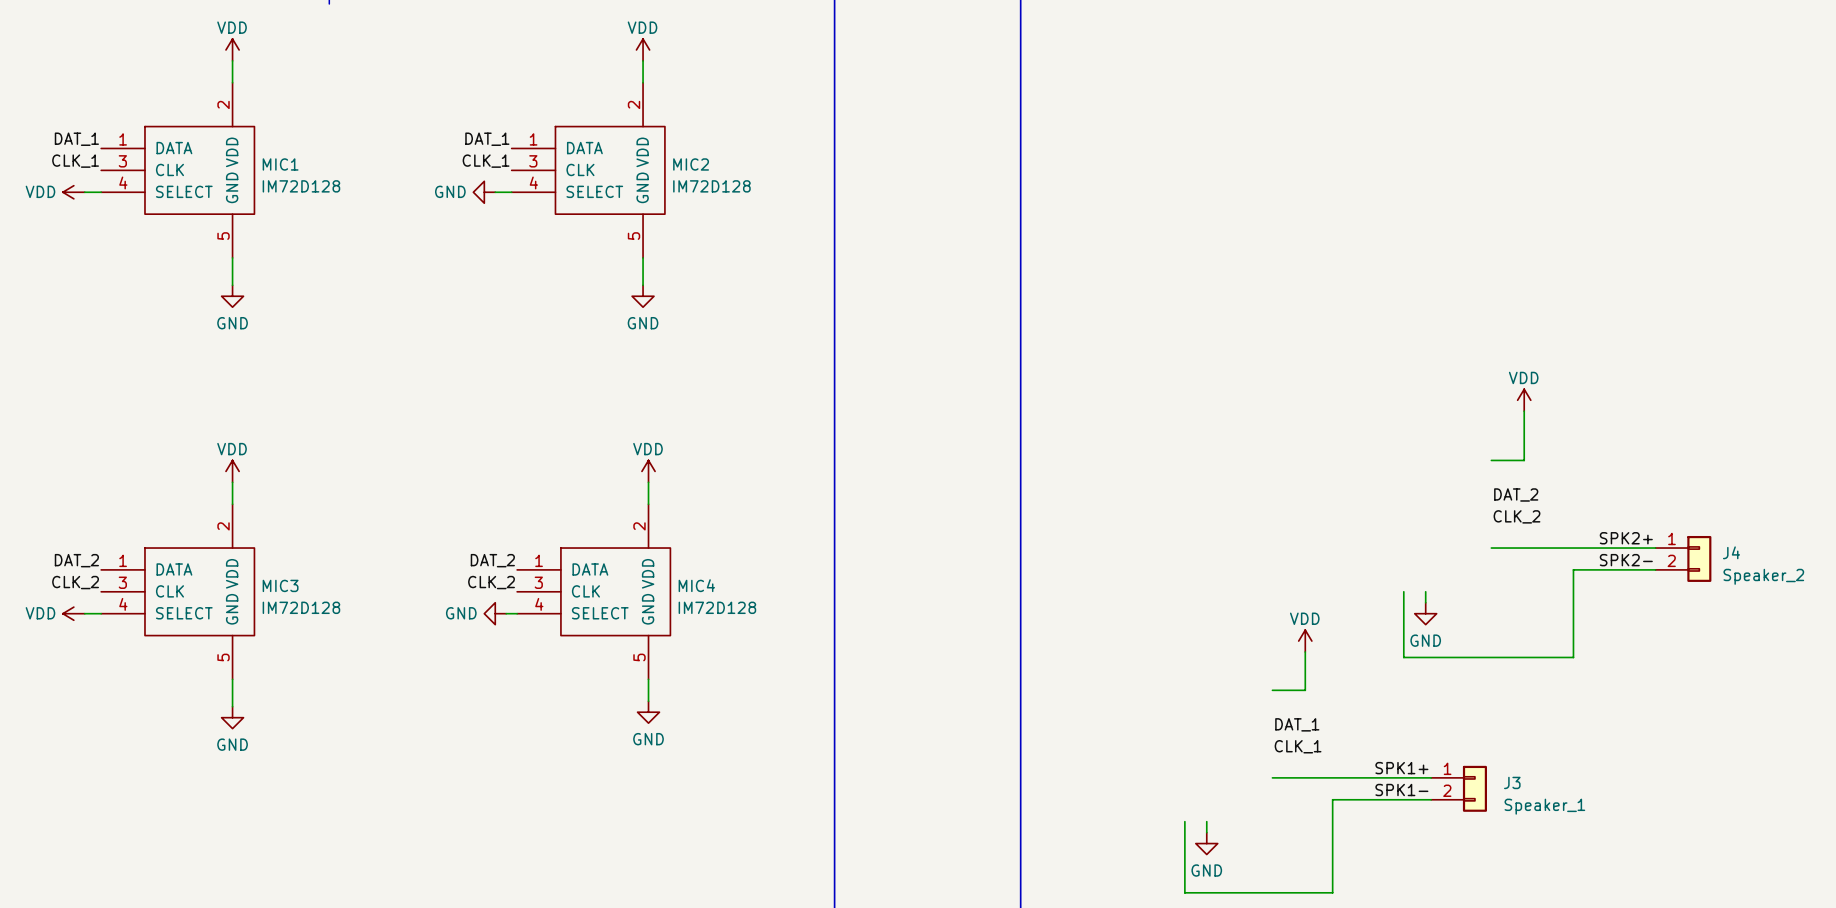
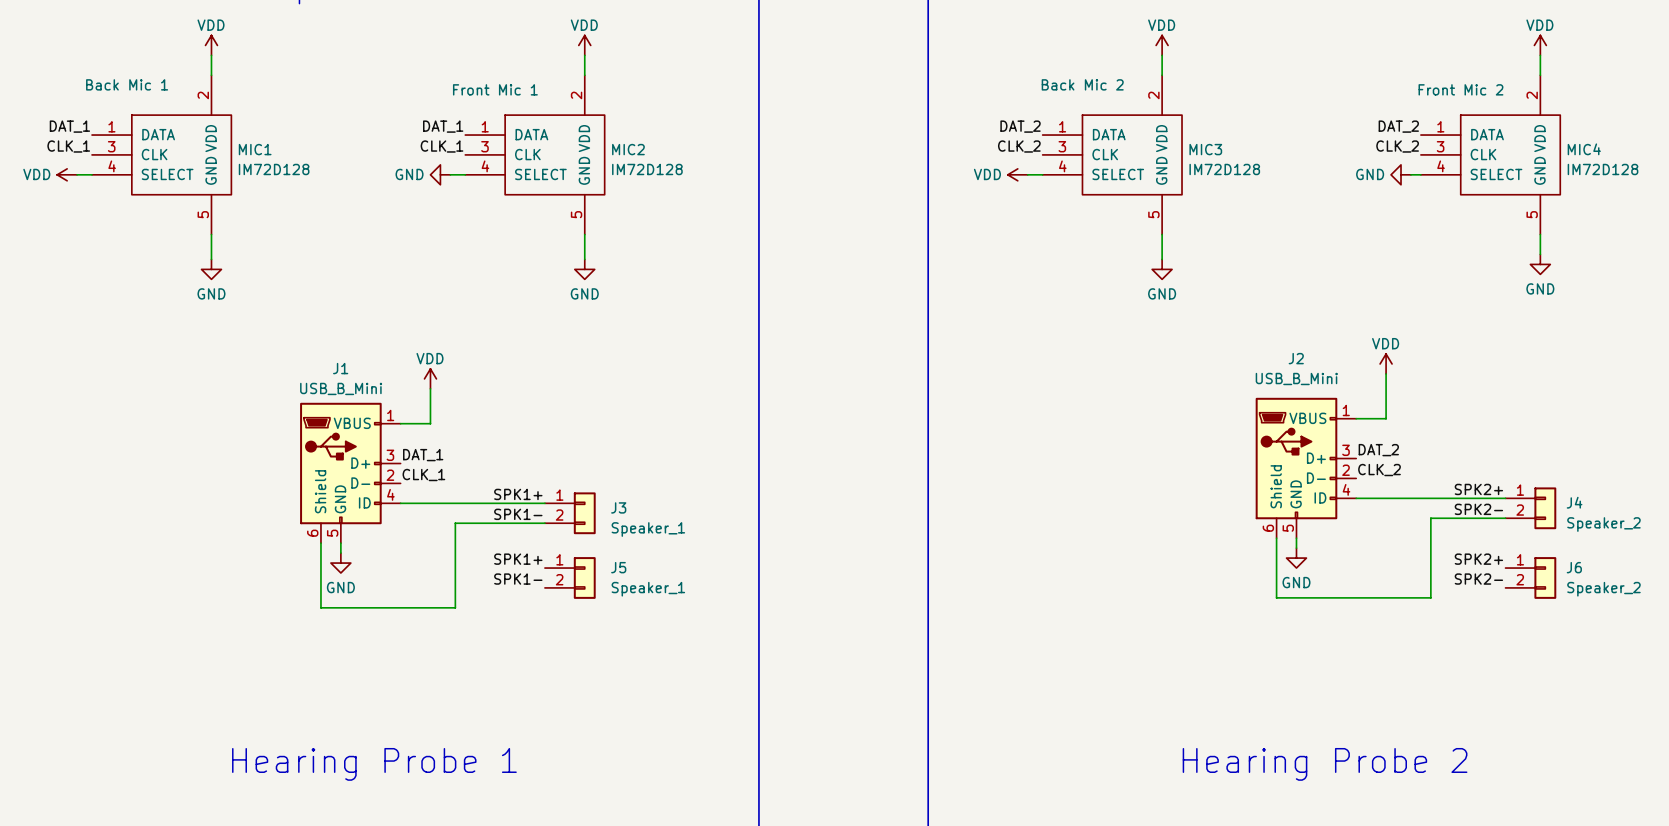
power symbol: none -> VDD (1162, 45)
power symbol: none -> VDD (1540, 45)
wire: none -> (1162, 55) (1162, 75)
wire: none -> (1540, 55) (1540, 75)
MIC1 text: none -> Back Mic 1 (127, 84)
MIC3 text: none -> Back Mic 2 (1082, 84)
MIC2 text: none -> Front Mic 1 (495, 89)
MIC4 text: none -> Front Mic 2 (1460, 89)
label: none -> DAT_2 (1020, 126)
label: none -> DAT_2 (1398, 126)
label: none -> CLK_2 (1019, 146)
label: none -> CLK_2 (1397, 146)
power symbol: none -> VDD (1017, 174)
wire: none -> (1027, 174) (1042, 174)
power symbol: none -> GND (1401, 174)
wire: none -> (1410, 174) (1420, 174)
wire: none -> (1162, 234) (1162, 259)
wire: none -> (1540, 234) (1540, 254)
power symbol: none -> GND (1540, 264)
power symbol: none -> GND (1162, 269)
power symbol: none -> VDD (430, 378)
wire: none -> (430, 388) (430, 423) (400, 423)
power symbol: VDD (232, 471) -> none
power symbol: VDD (648, 471) -> none
wire: (232, 482) (232, 504) -> none
wire: (648, 482) (648, 504) -> none
label: none -> DAT_1 (423, 455)
J2: none -> USB_B_Mini (1305, 467)
J1: none -> USB_B_Mini (350, 472)
label: none -> CLK_1 (423, 475)
label: none -> SPK1+ (518, 494)
wire: none -> (400, 503) (544, 503)
label: DAT_2 (76, 560) -> none
label: DAT_2 (492, 560) -> none
label: none -> SPK1- (518, 514)
wire: none -> (544, 523) (455, 523) (455, 607) (320, 607) (320, 543)
label: CLK_2 (75, 582) -> none
label: CLK_2 (491, 582) -> none
MIC3 position: (177, 591) -> (1112, 154)
MIC4 position: (593, 591) -> (1490, 154)
wire: none -> (340, 543) (340, 553)
power symbol: VDD (73, 613) -> none
wire: (84, 613) (101, 613) -> none
power symbol: GND (495, 613) -> none
wire: (506, 613) (517, 613) -> none
label: none -> SPK1+ (518, 559)
label: none -> SPK2+ (1478, 559)
power symbol: none -> GND (340, 563)
J5: none -> Speaker_1 (570, 577)
J6: none -> Speaker_2 (1530, 577)
label: none -> SPK1- (518, 579)
label: none -> SPK2- (1478, 579)
power symbol: VDD (1305, 641) -> none
wire: (1305, 652) (1305, 690) (1272, 690) -> none
wire: (232, 679) (232, 706) -> none
wire: (648, 679) (648, 701) -> none
power symbol: GND (648, 712) -> none
power symbol: GND (232, 717) -> none
label: DAT_1 (1297, 724) -> none
label: CLK_1 (1298, 746) -> none
label: SPK1+ (1401, 768) -> none
wire: (1272, 777) (1431, 777) -> none
J3 position: (1459, 788) -> (570, 513)
label: SPK1- (1401, 790) -> none
wire: (1431, 799) (1332, 799) (1332, 892) (1184, 892) (1184, 821) -> none
wire: (1206, 821) (1206, 832) -> none
text: none -> Hearing Probe 1 (374, 764)
text: none -> Hearing Probe 2 (1325, 764)
power symbol: GND (1206, 843) -> none

